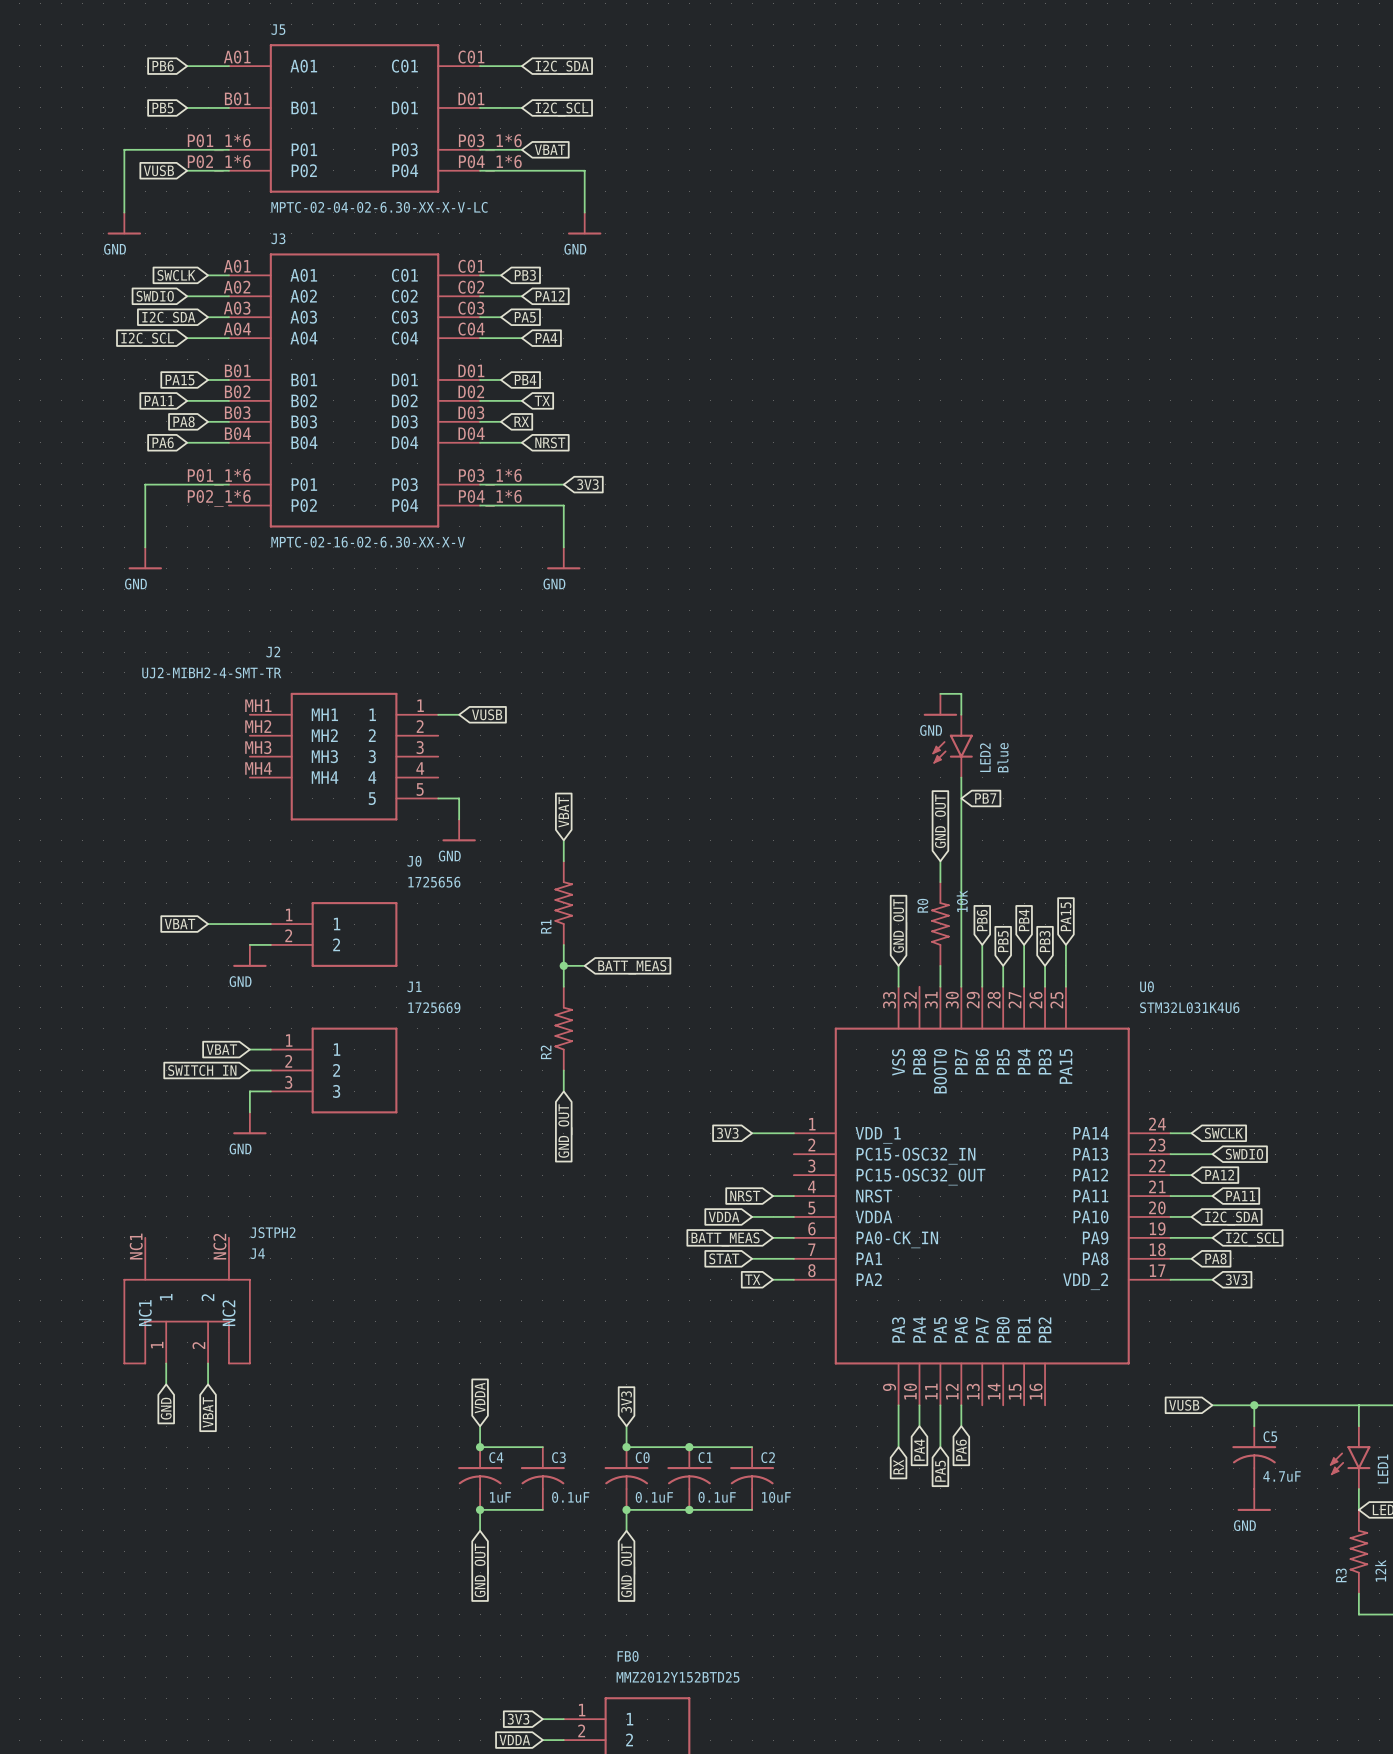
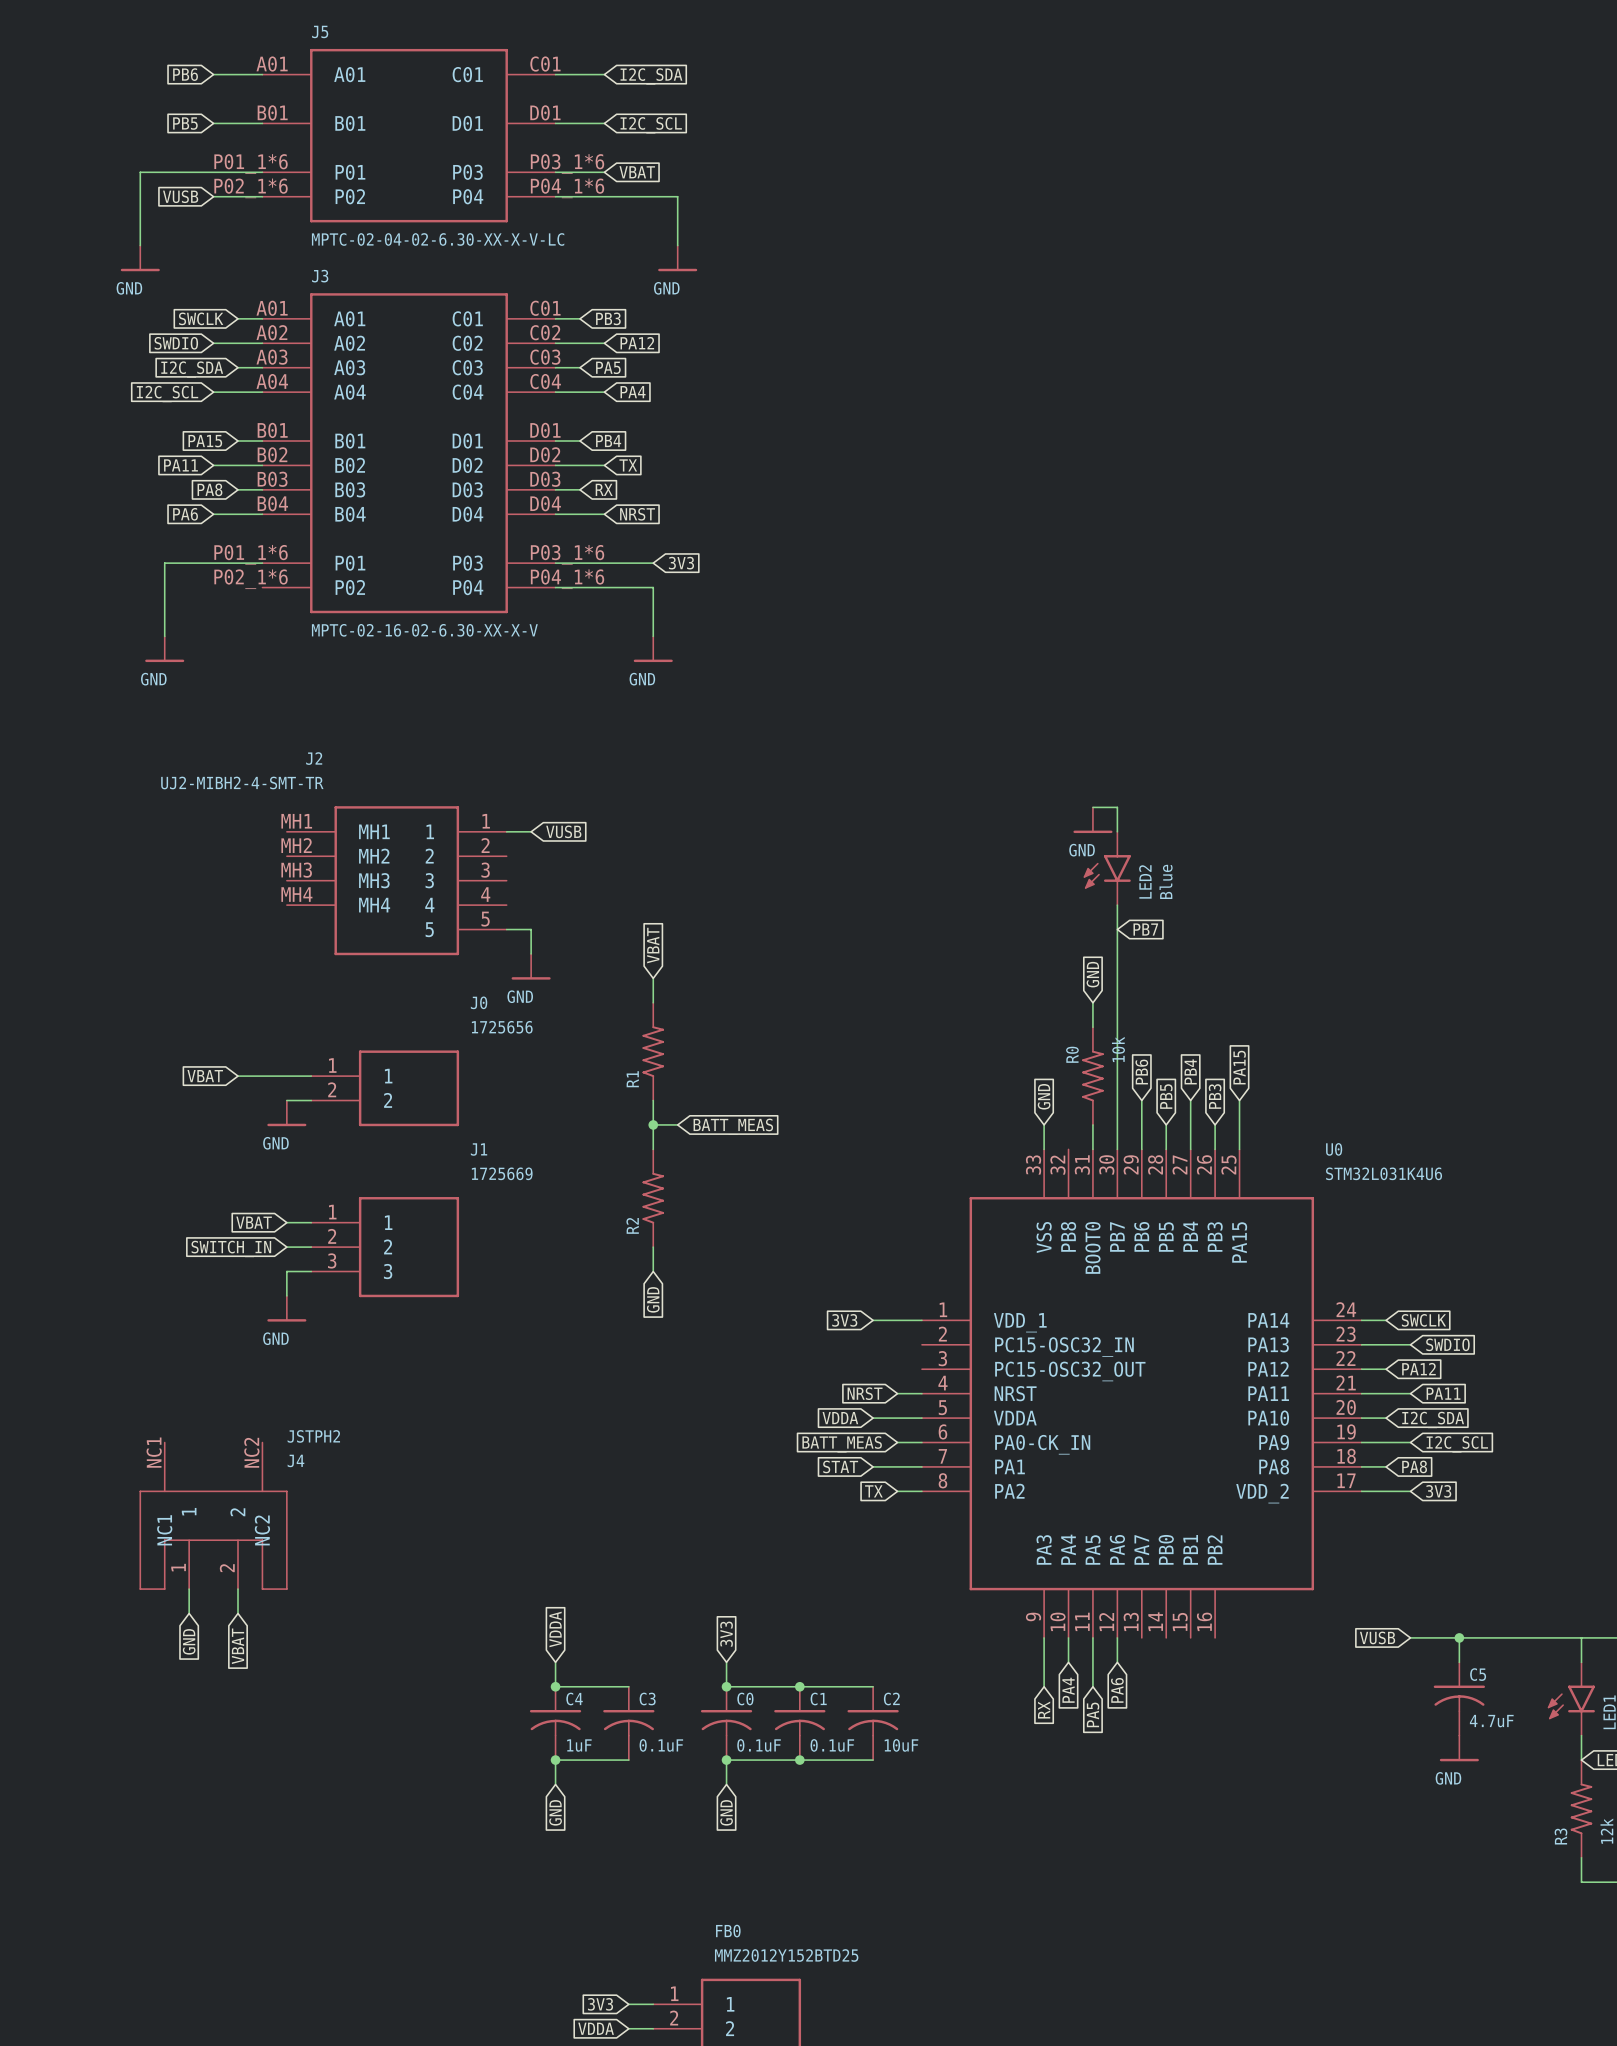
global label: GND_OUT (942, 821) -> GND (1092, 974)
global label: GND_OUT (900, 925) -> GND (1044, 1096)
global label: GND_OUT (565, 1131) -> GND (653, 1299)
global label: GND_OUT (481, 1570) -> GND (555, 1812)
global label: GND_OUT (628, 1570) -> GND (726, 1812)

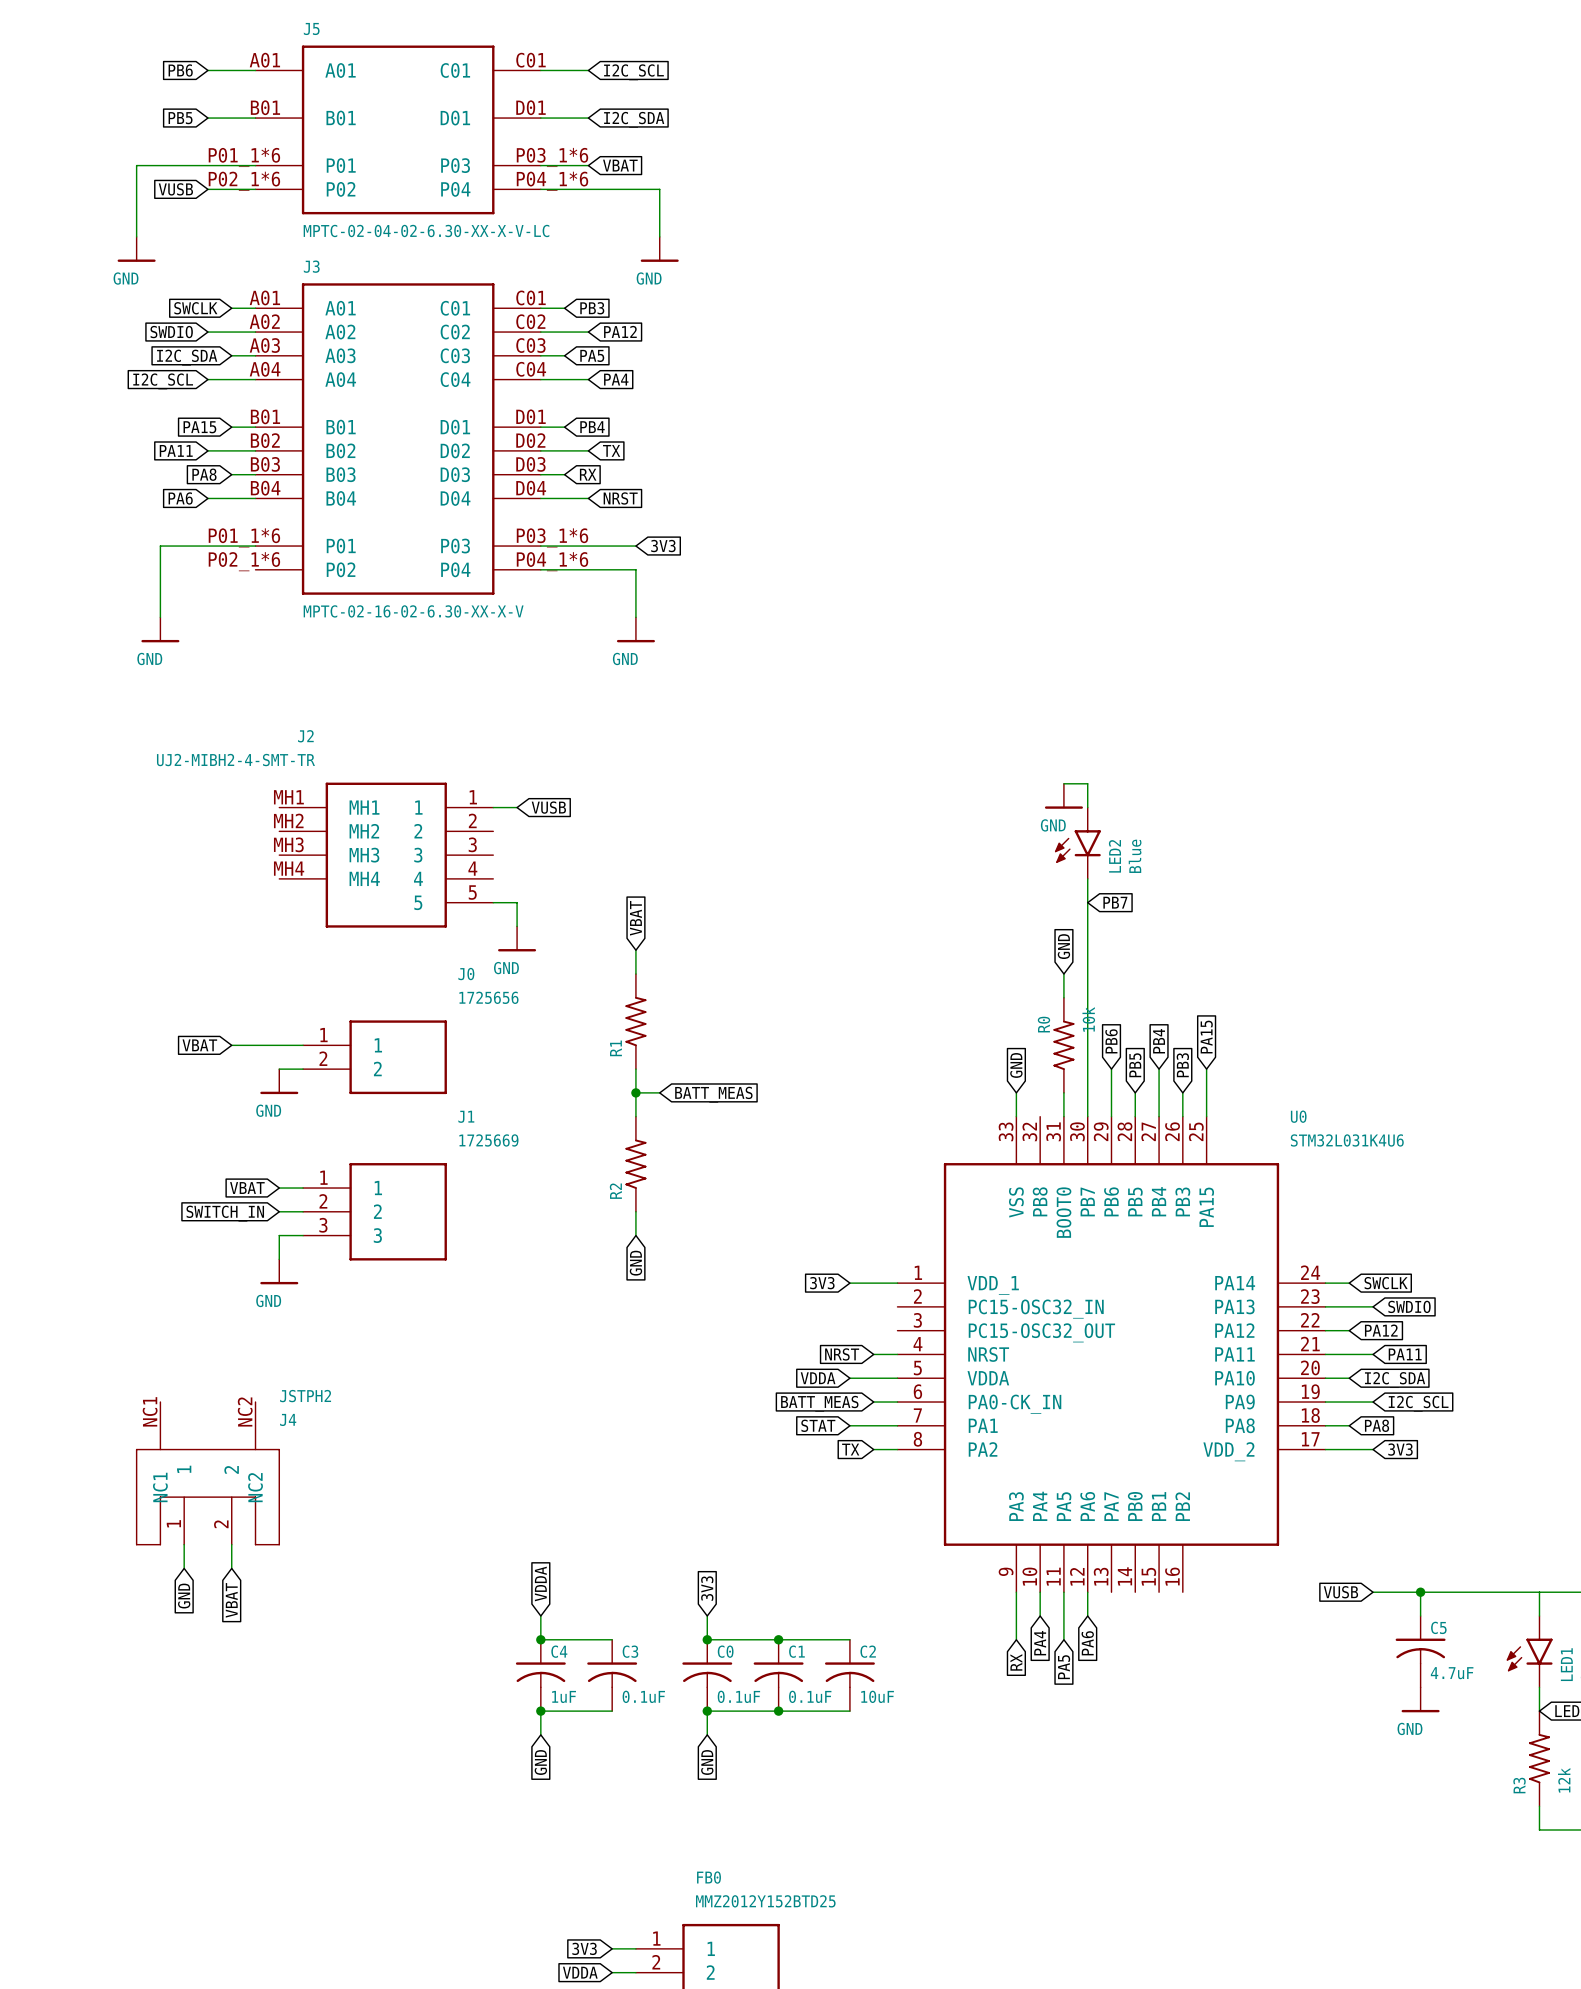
global label: I2C_SDA (651, 76) -> I2C_SCL (633, 72)
global label: I2C_SCL (651, 125) -> I2C_SDA (634, 119)

